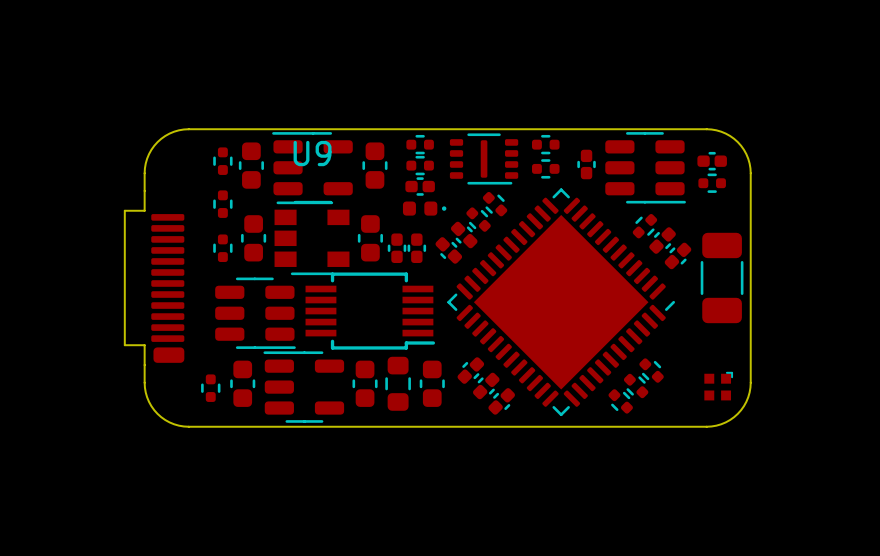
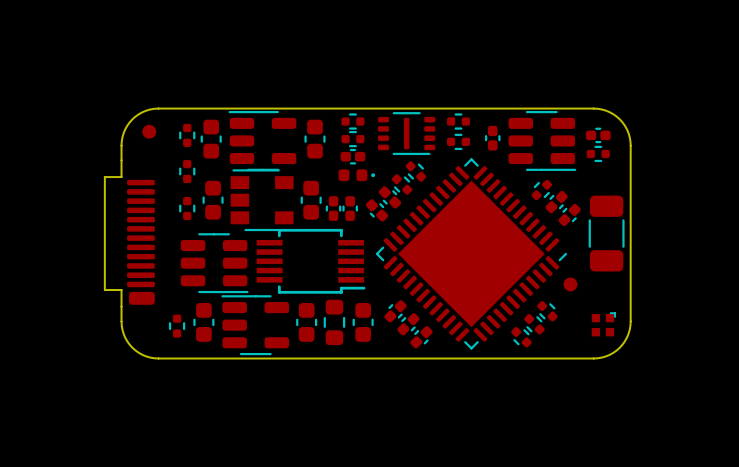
U9 name: U9 (312, 153) -> none
part: none -> (149, 131)
part: none -> (570, 284)

